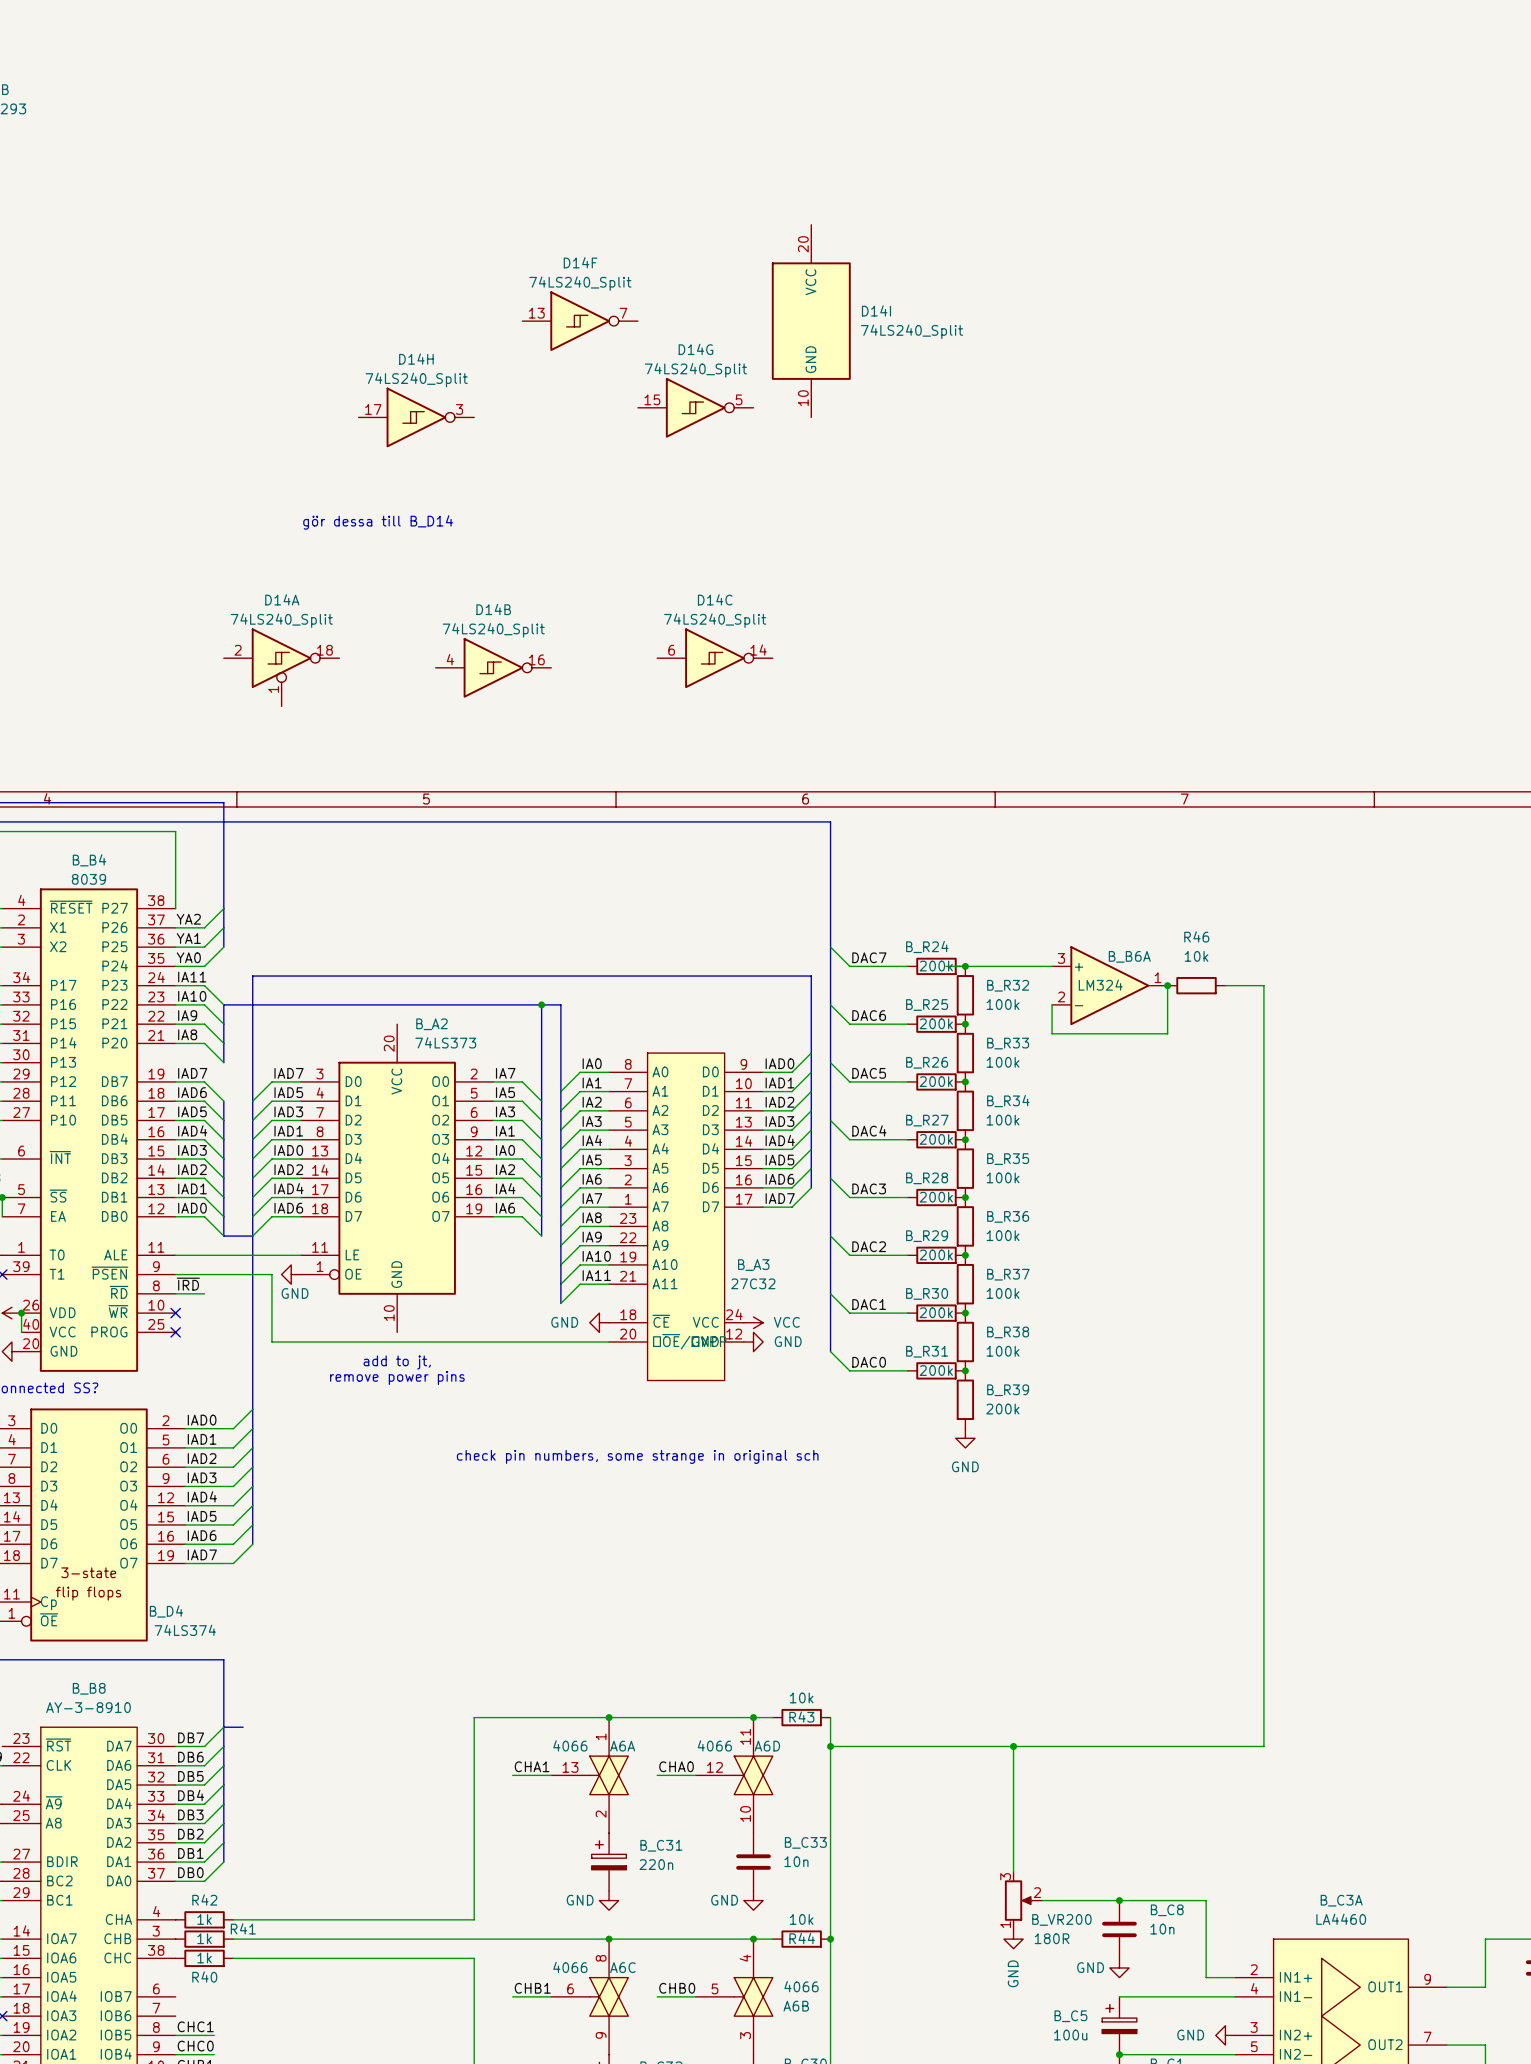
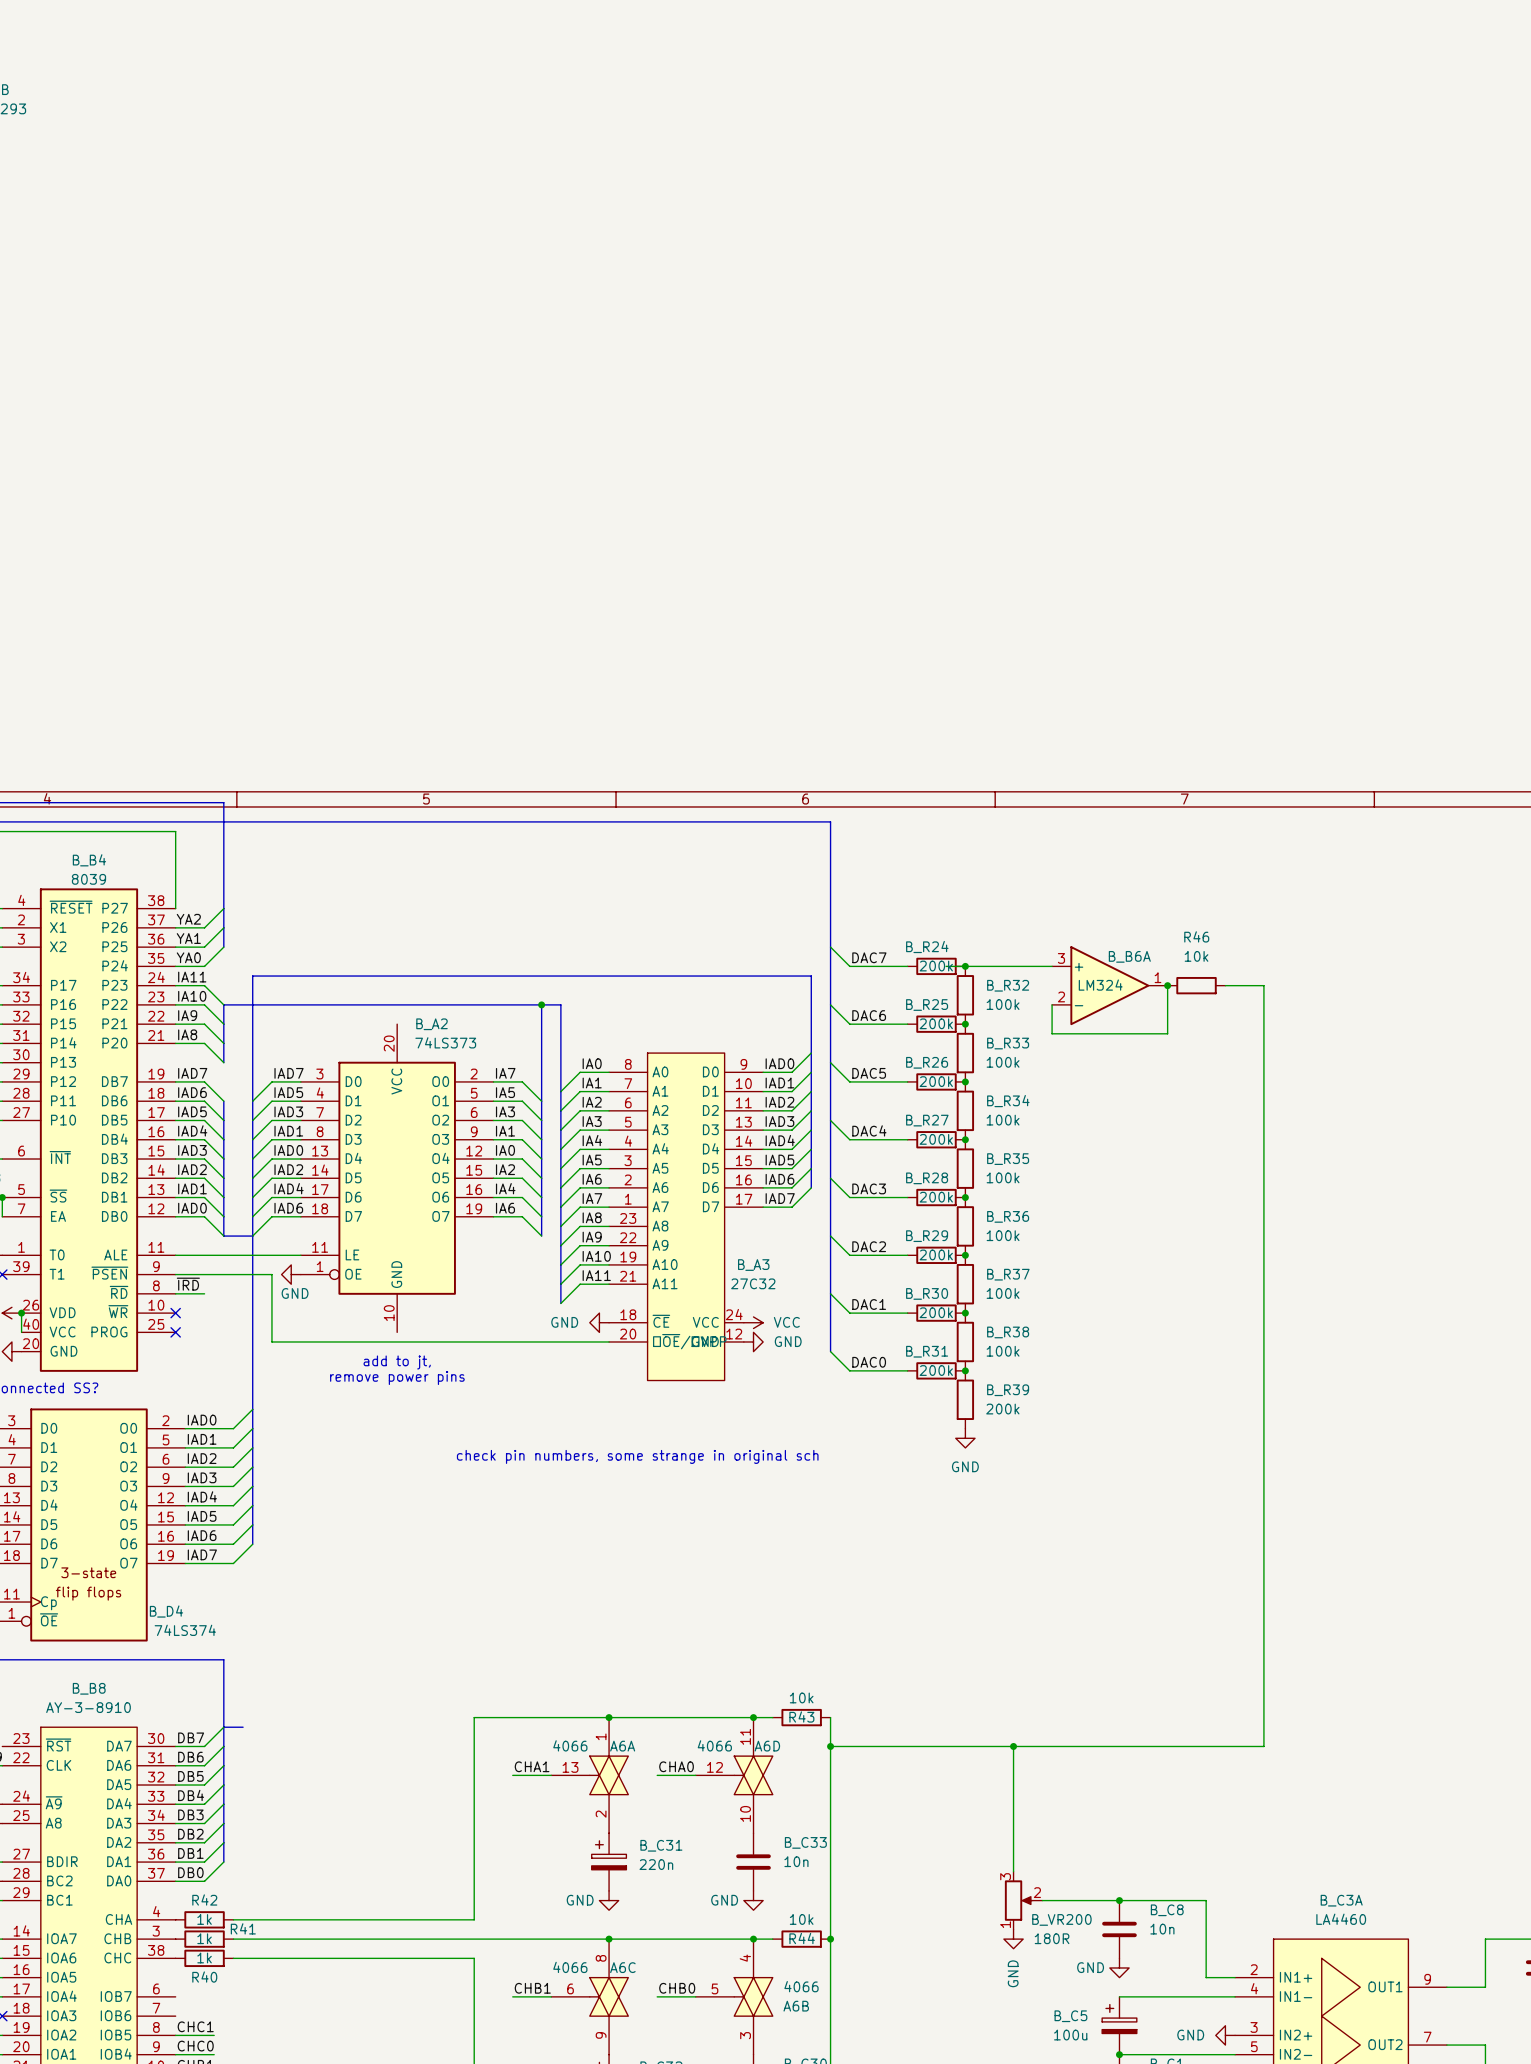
D14F: 74LS240_Split (580, 321) -> none
D14I: 74LS240_Split (811, 321) -> none
D14G: 74LS240_Split (695, 407) -> none
D14H: 74LS240_Split (416, 417) -> none
text: gör dessa till B_D14 (378, 522) -> none
D14C: 74LS240_Split (714, 658) -> none
D14A: 74LS240_Split (281, 667) -> none
D14B: 74LS240_Split (493, 667) -> none

